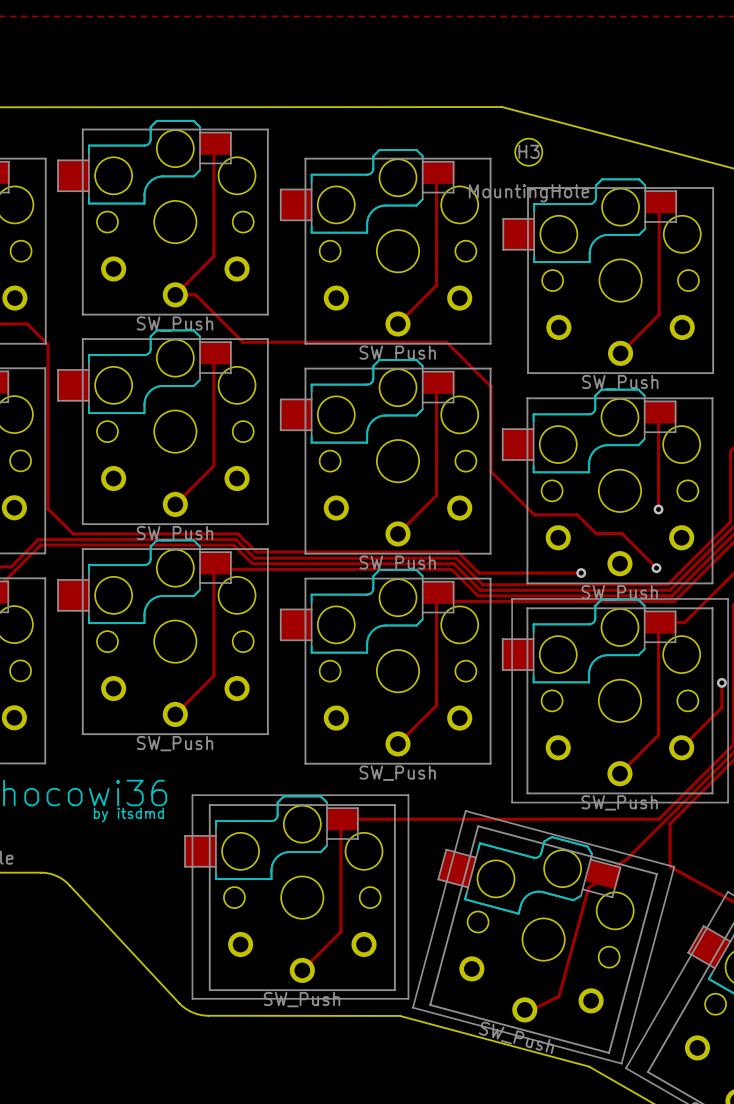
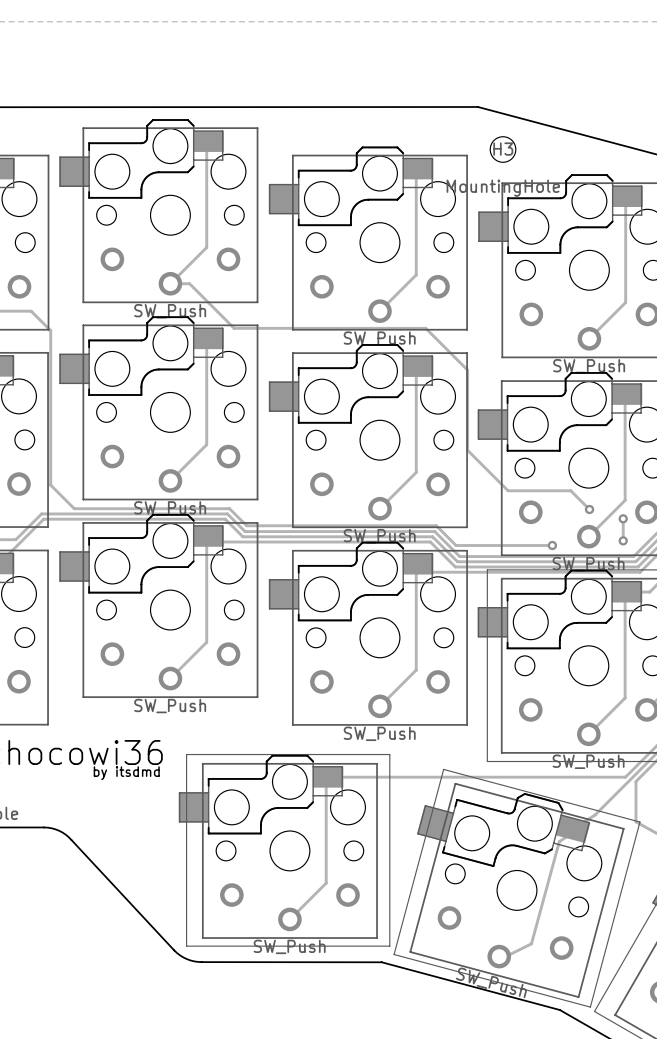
track: none -> (625, 485) (625, 500) (588, 536)
via: (658, 509) -> none
track: (577, 514) (596, 533) (621, 533) (656, 568) -> (548, 490) (570, 490) (589, 509)
via: none -> (589, 509)
track: none -> (623, 518) (623, 540)
via: none -> (623, 518)

